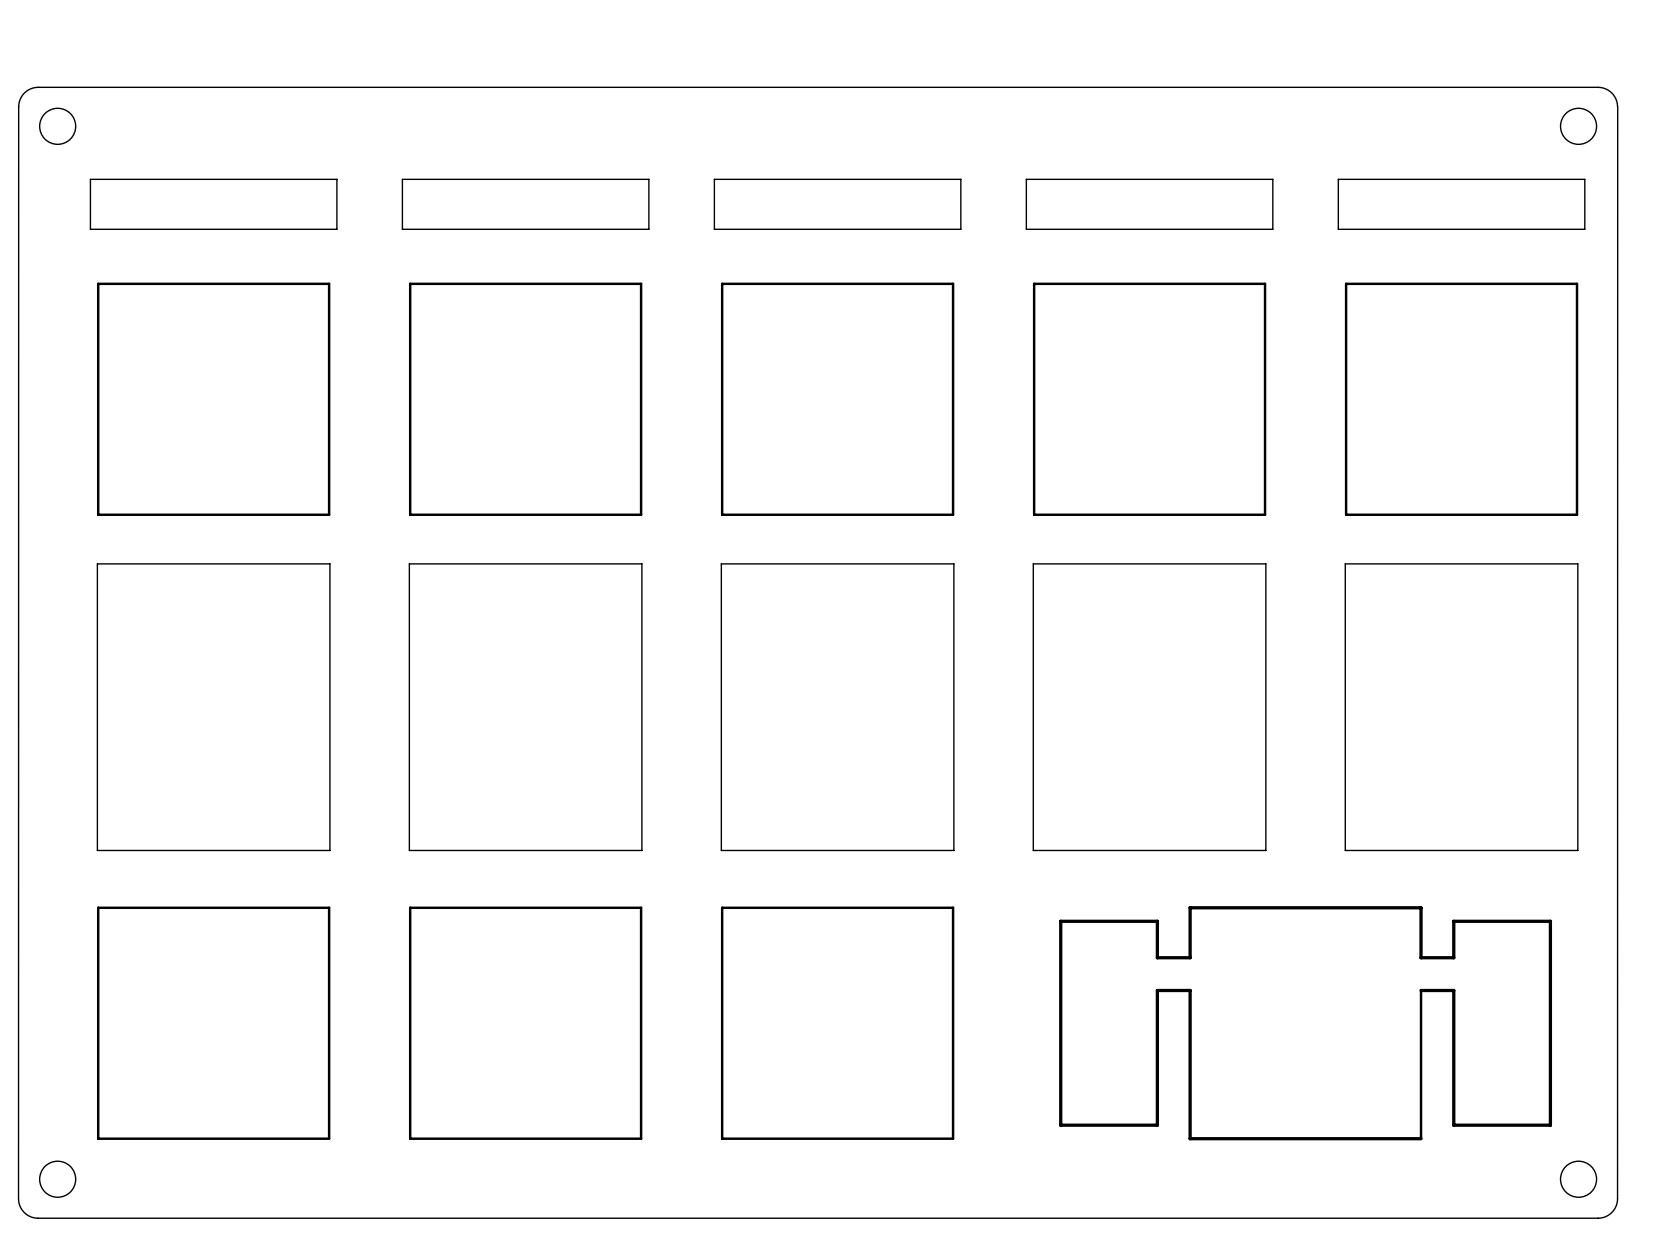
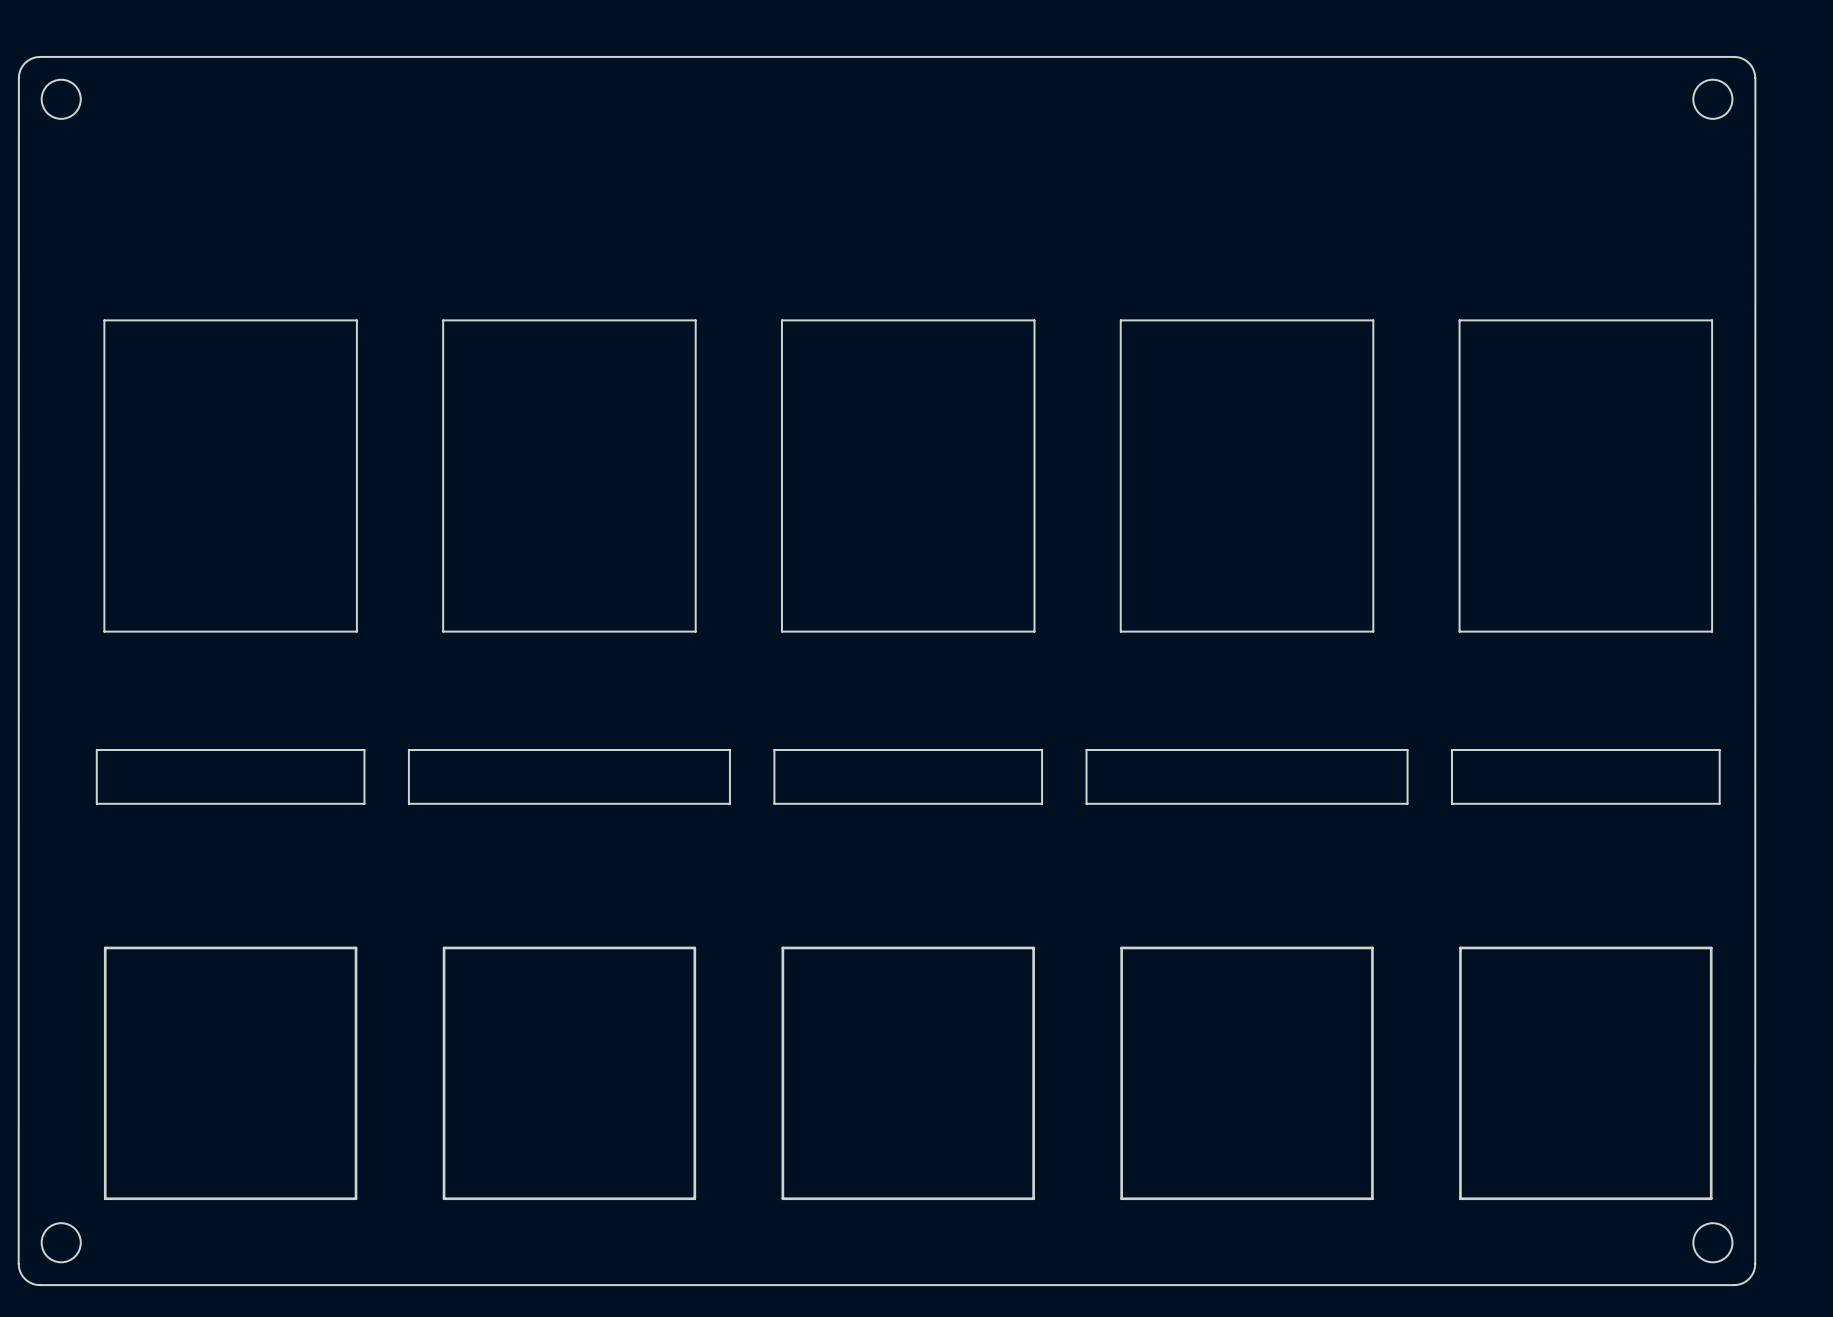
drawing: [90, 178, 338, 230] -> none
drawing: [401, 178, 650, 230] -> none
drawing: [713, 178, 962, 230] -> none
drawing: [1025, 178, 1274, 230] -> none
drawing: [1337, 178, 1586, 230] -> none
drawing: [96, 282, 331, 516] -> none
drawing: [408, 282, 643, 516] -> none
drawing: [720, 282, 955, 516] -> none
drawing: [1032, 282, 1267, 516] -> none
drawing: [1344, 282, 1579, 516] -> none
drawing: none -> [103, 319, 358, 633]
drawing: none -> [442, 319, 697, 633]
drawing: none -> [781, 319, 1036, 633]
drawing: none -> [1120, 319, 1375, 633]
drawing: none -> [1458, 319, 1713, 633]
drawing: [96, 563, 331, 852] -> none
drawing: [408, 563, 643, 852] -> none
drawing: [720, 563, 955, 852] -> none
drawing: [1032, 563, 1267, 852] -> none
drawing: [1344, 563, 1579, 852] -> none
drawing: none -> [96, 749, 365, 805]
drawing: none -> [408, 749, 731, 805]
drawing: none -> [773, 749, 1043, 805]
drawing: none -> [1086, 749, 1408, 805]
drawing: none -> [1451, 749, 1721, 805]
drawing: none -> [1120, 946, 1374, 1201]
drawing: [1059, 906, 1553, 1141] -> none
drawing: none -> [1459, 946, 1713, 1201]

